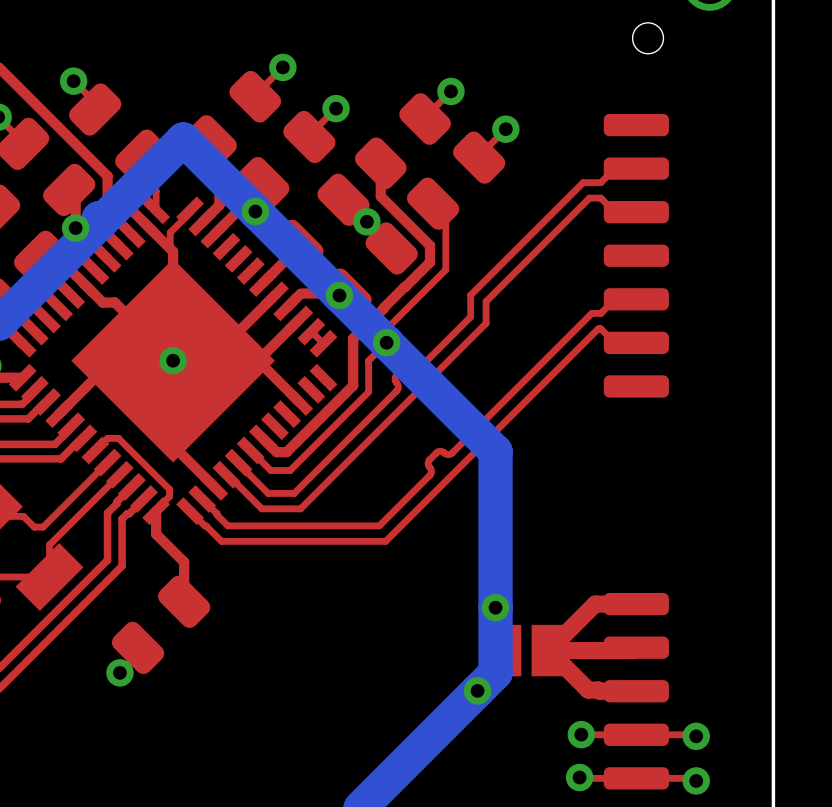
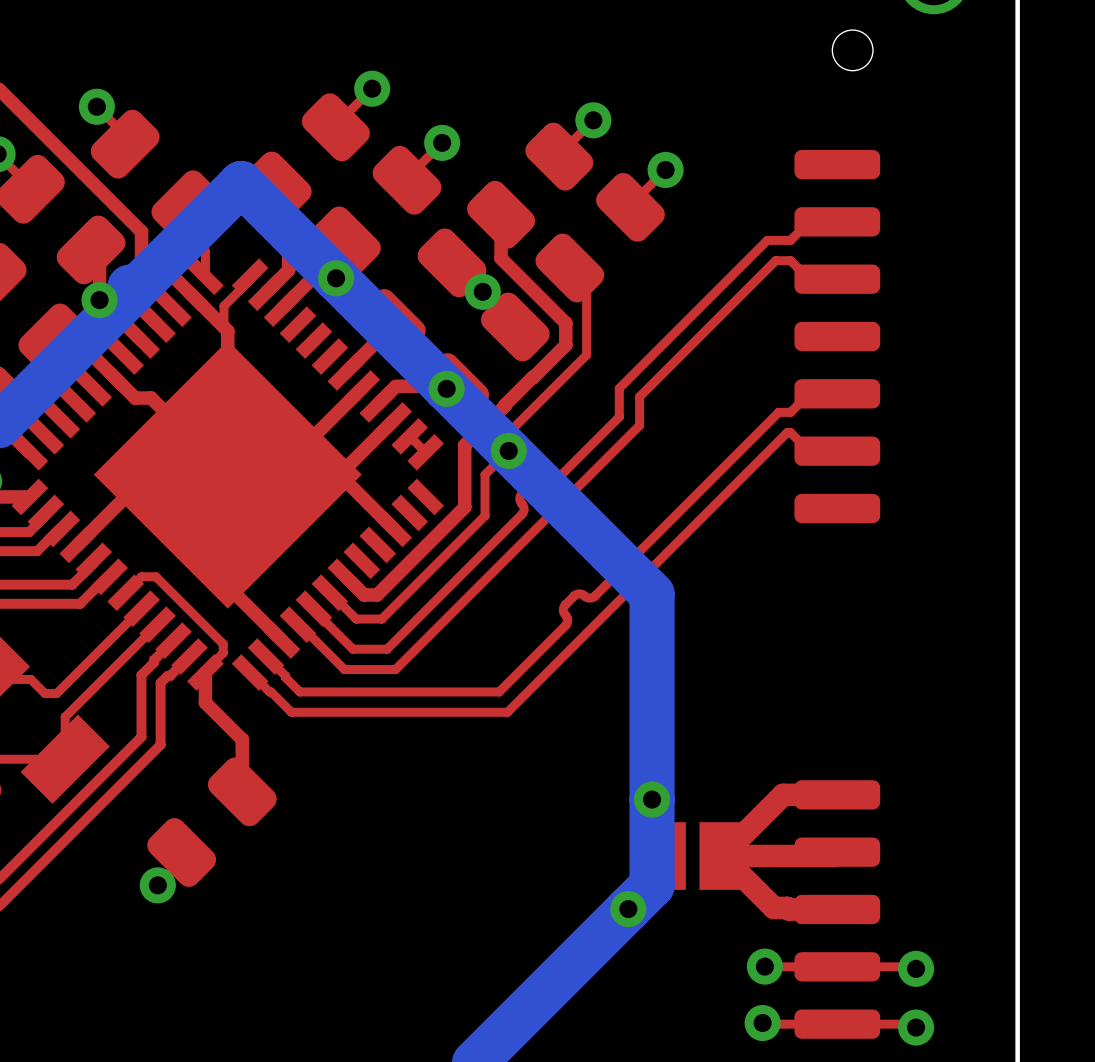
via: (173, 360) -> none

